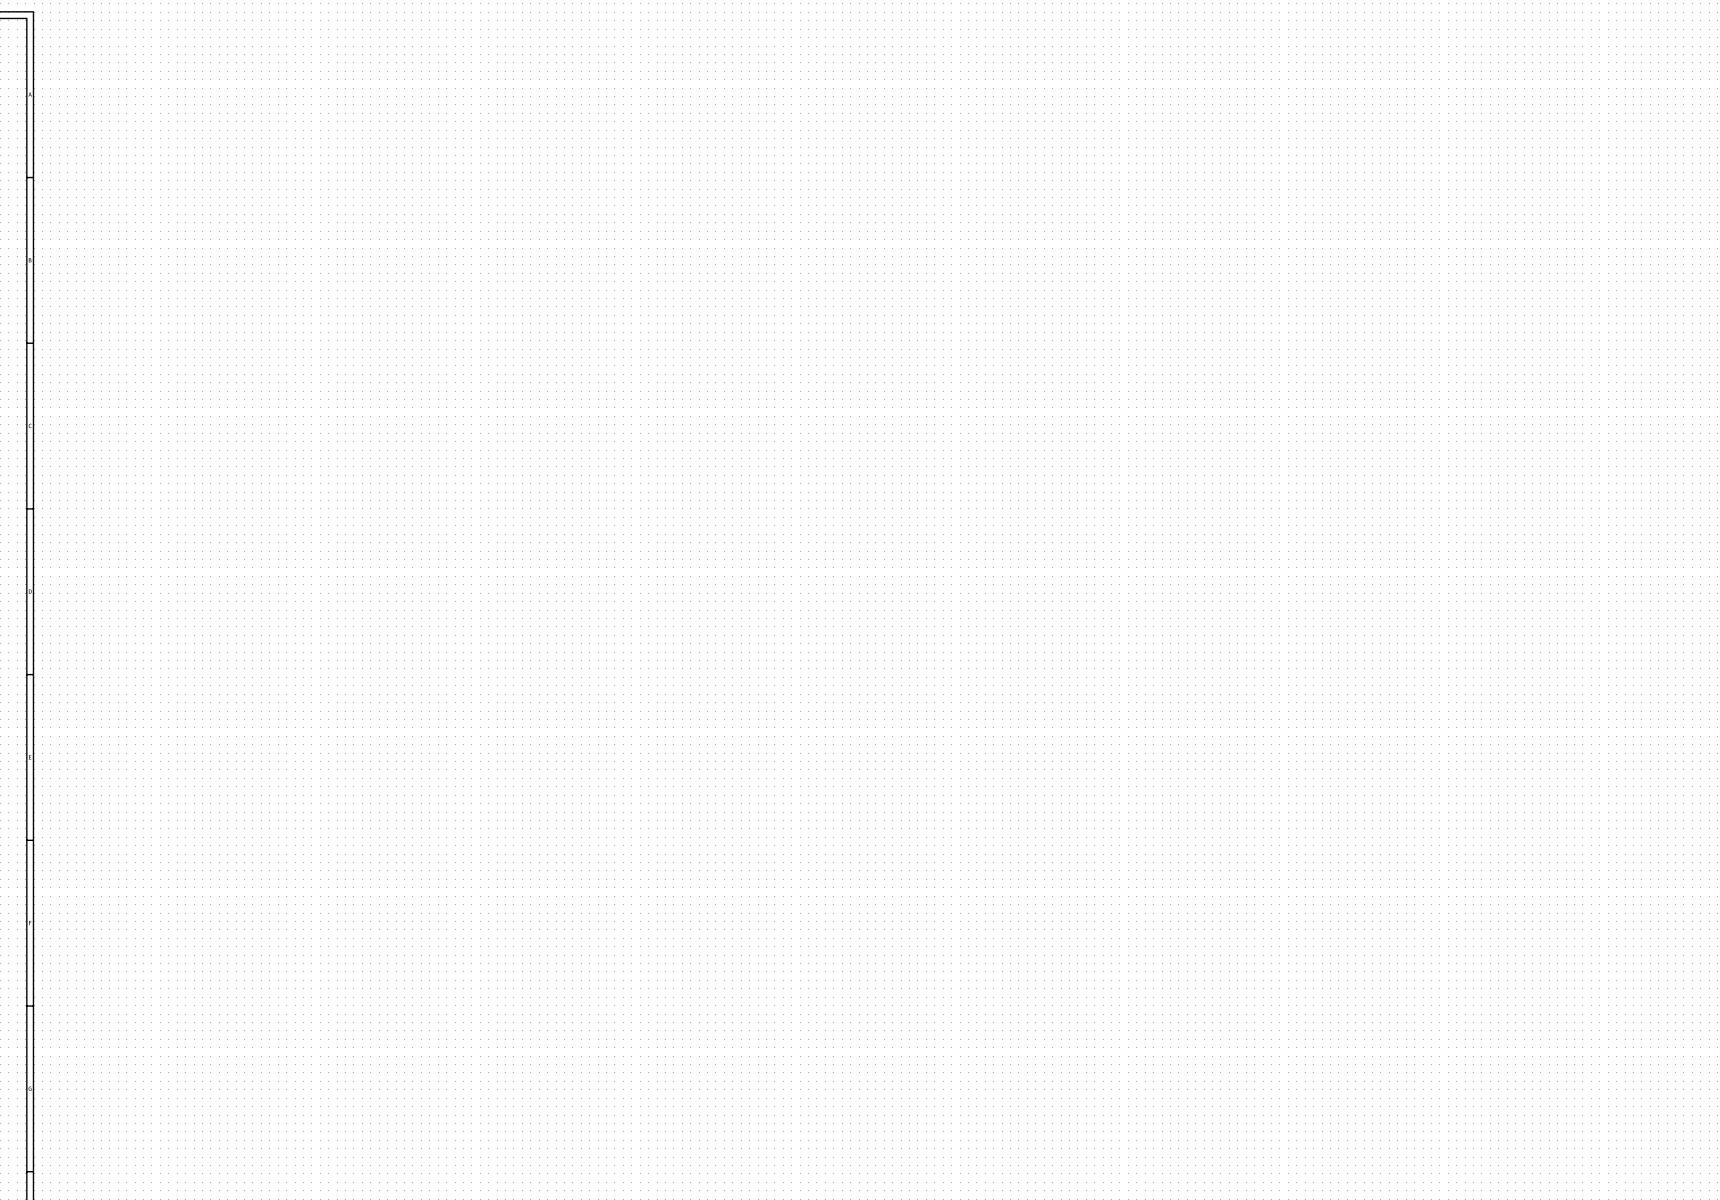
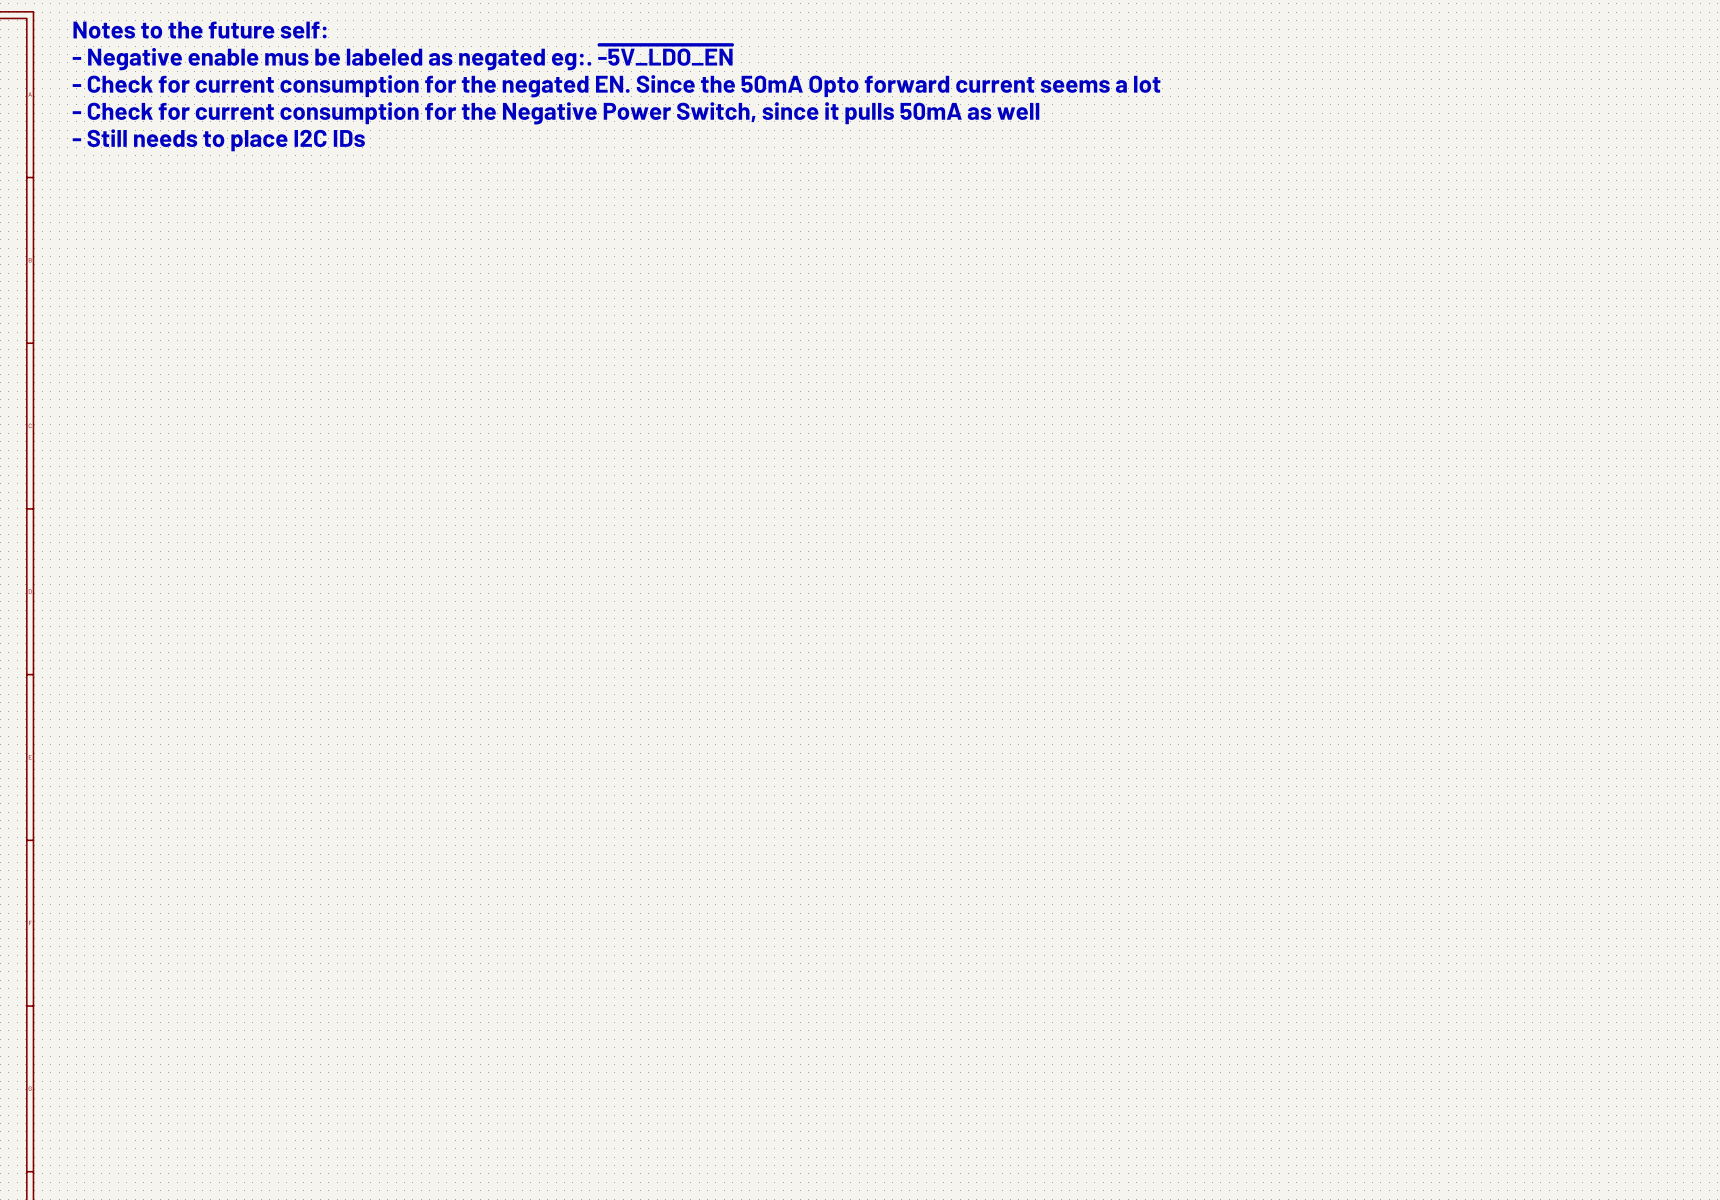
text: none -> Notes to the future self: (200, 30)
text: none -> - Negative enable mus be labeled as negated eg:. ~{-5V_LDO_EN} (402, 57)
text: none -> - Check for current consumption for the negated EN. Since the 50mA Opto forward current seems a lot (616, 86)
text: none -> - Check for current consumption for the Negative Power Switch, since it pulls 50mA as well (555, 113)
text: none -> - Still needs to place I2C IDs (218, 140)

